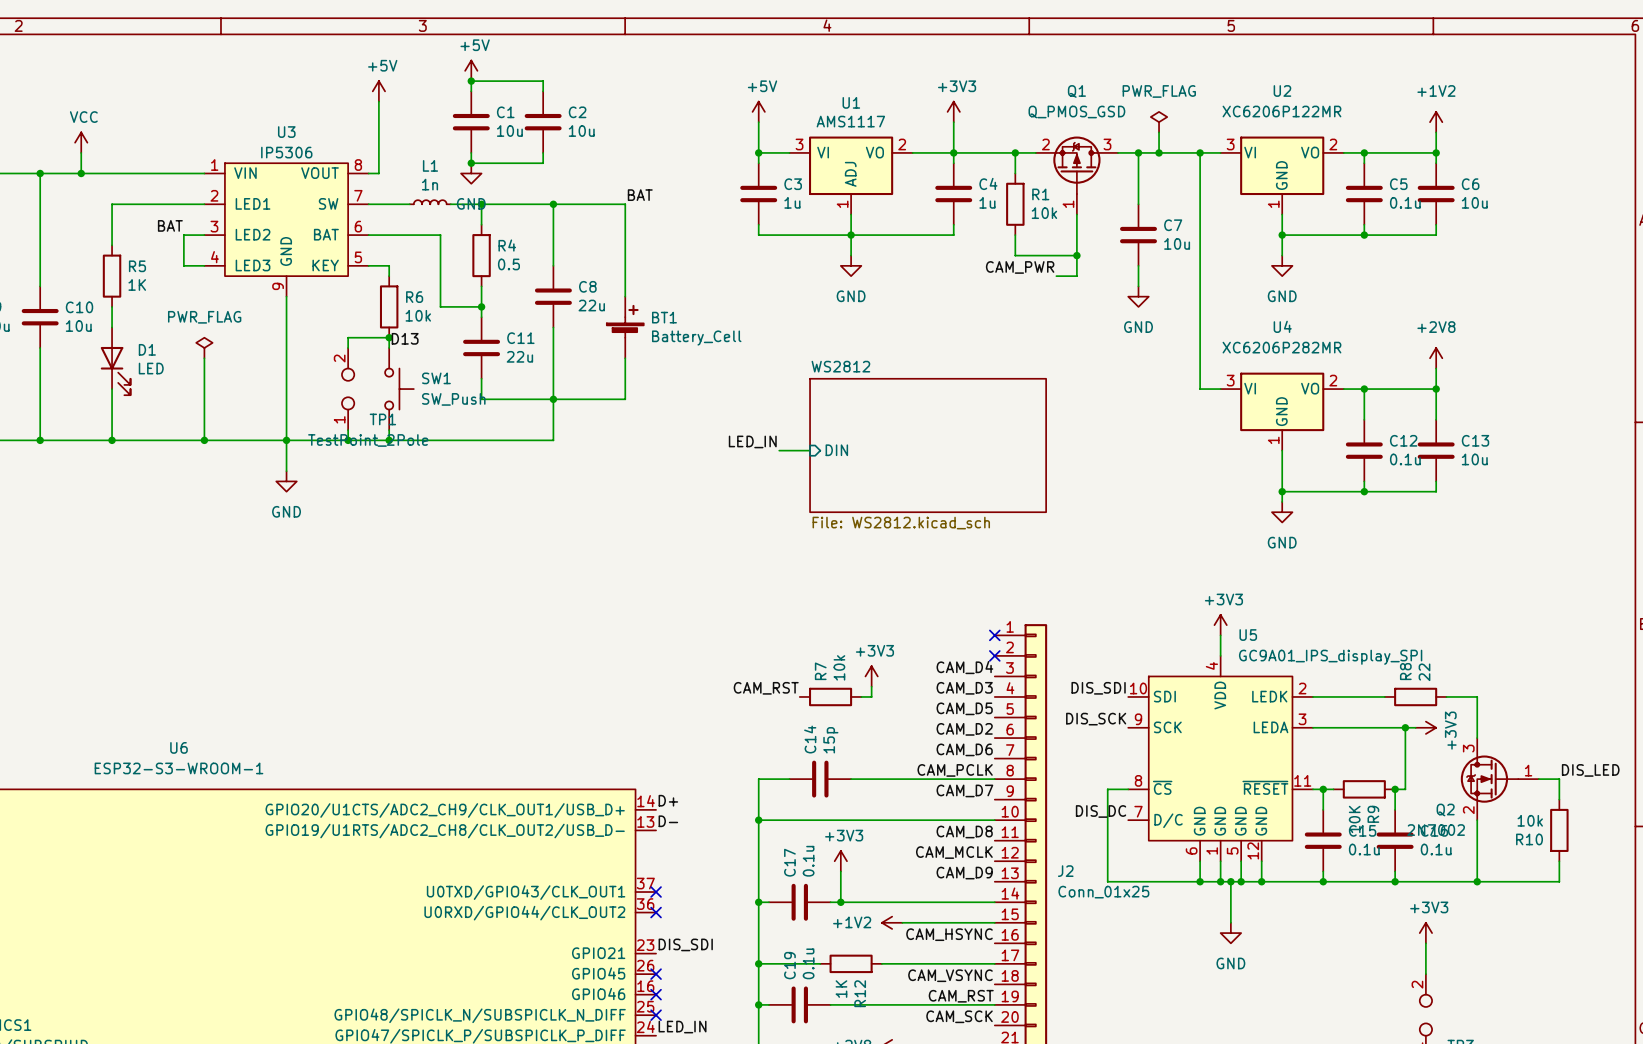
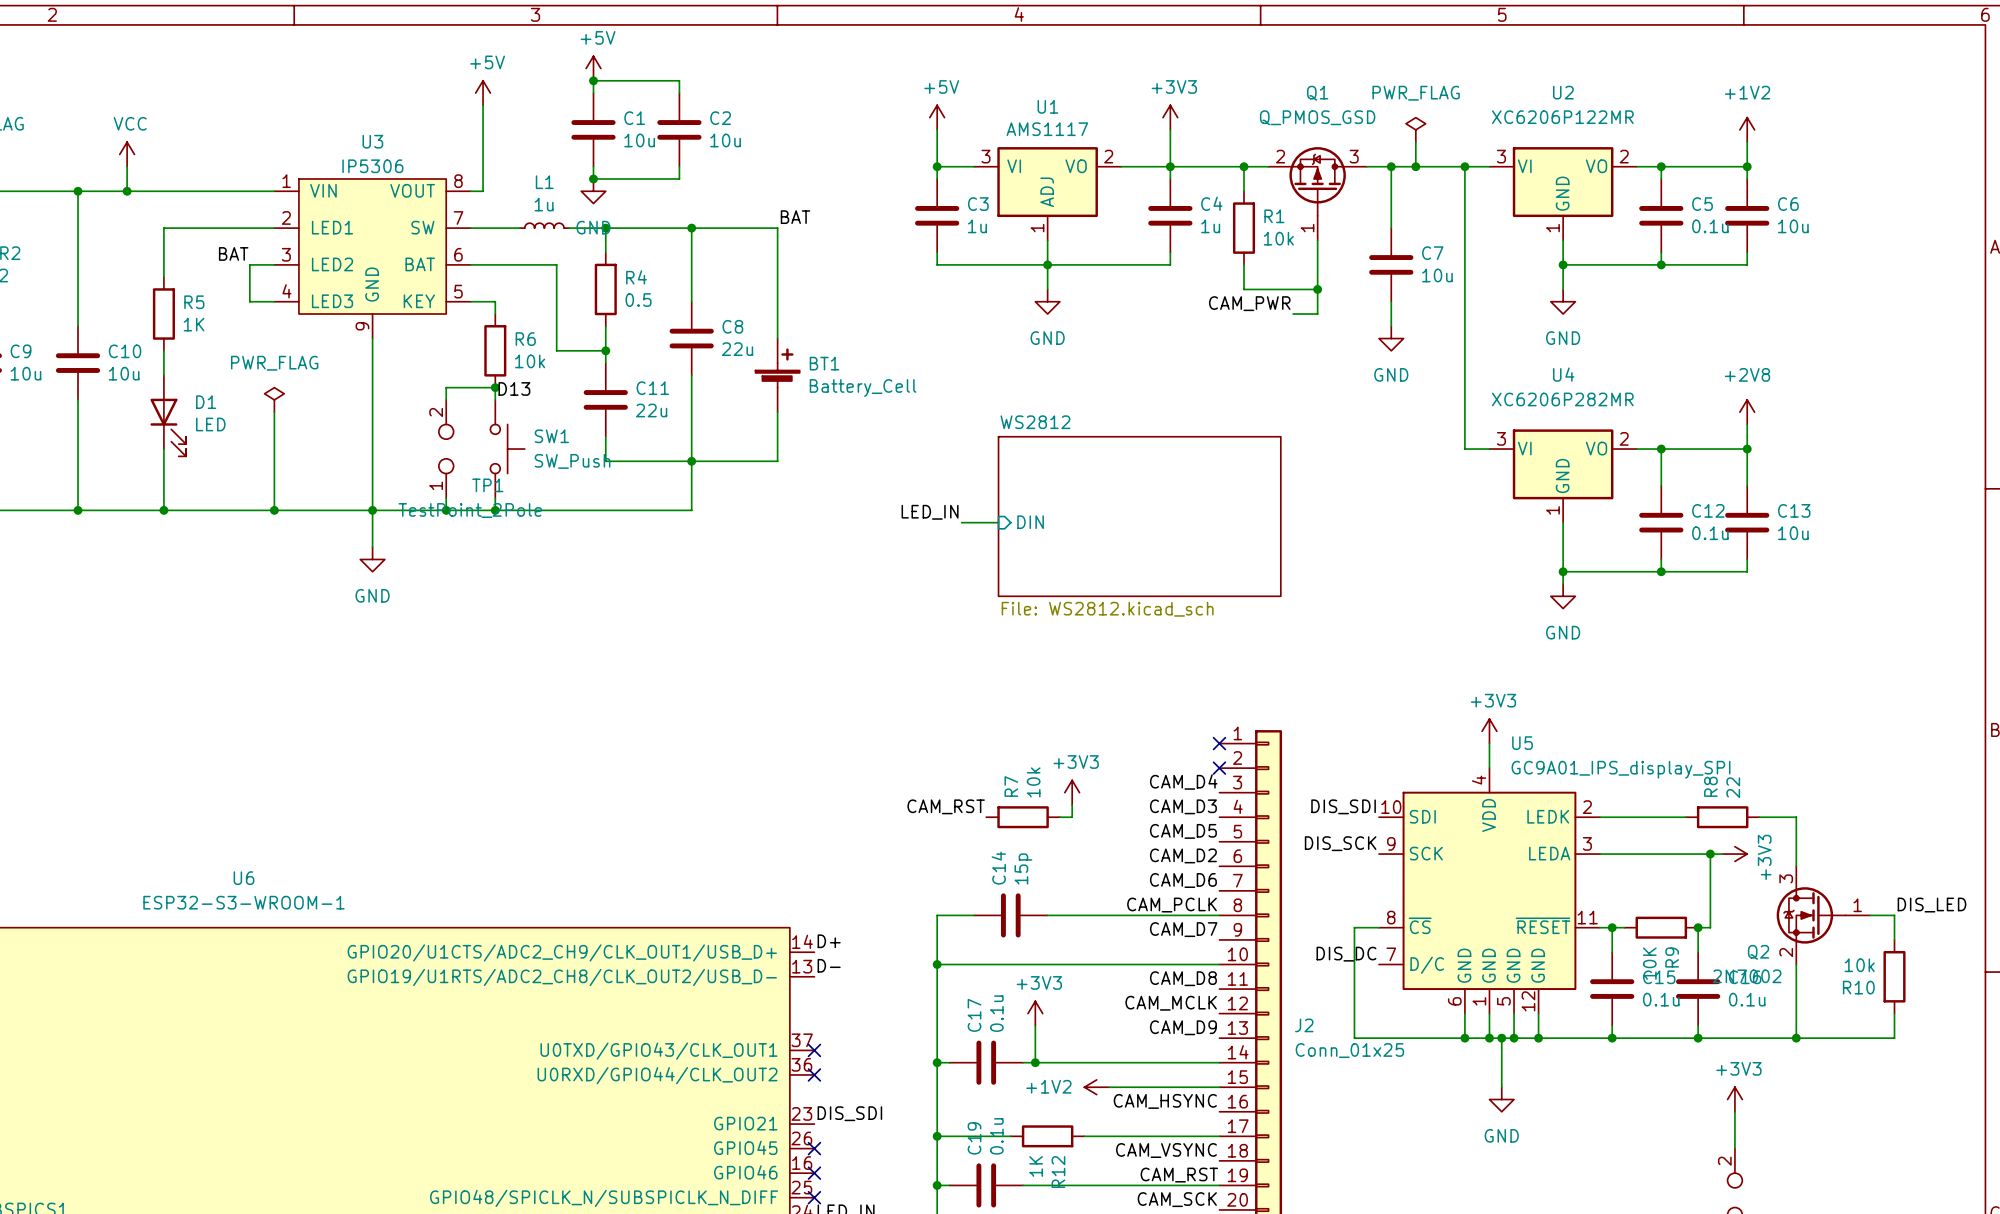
L1 value: 1n (429, 184) -> 1u (544, 204)

